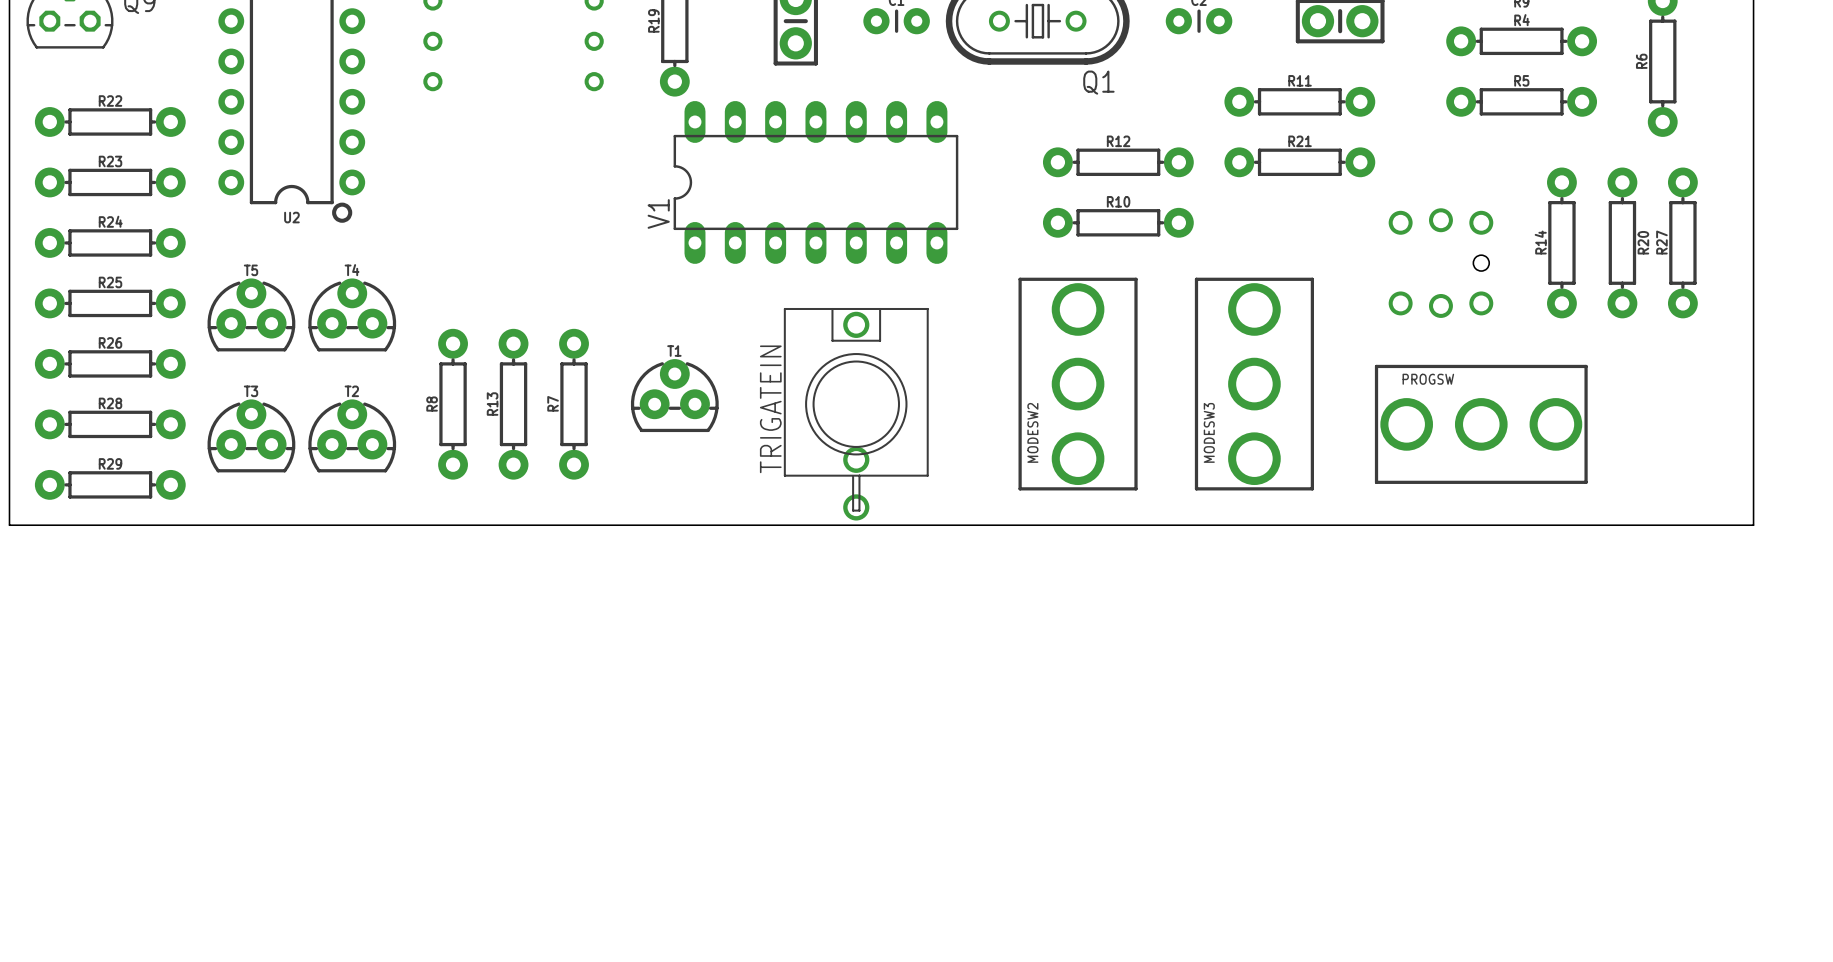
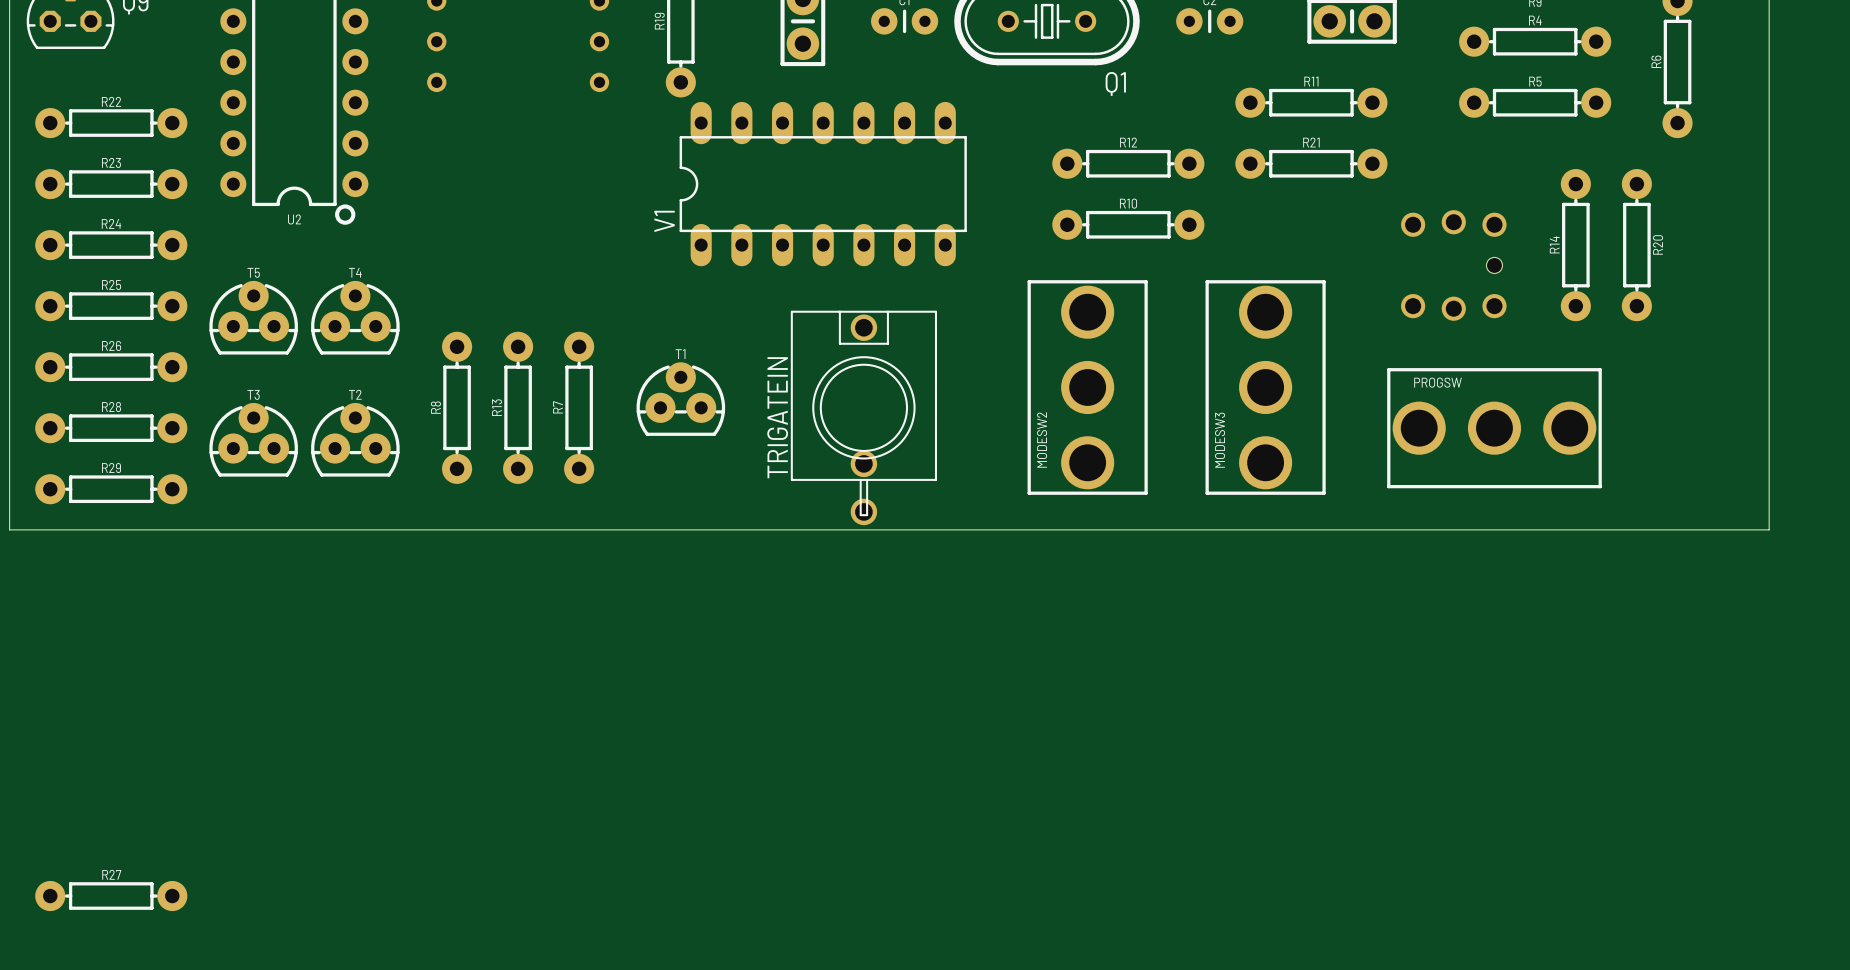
R27 rotation: 0° (1682, 242) -> 90° clockwise (111, 896)
R27 position: (1682, 242) -> (111, 896)

